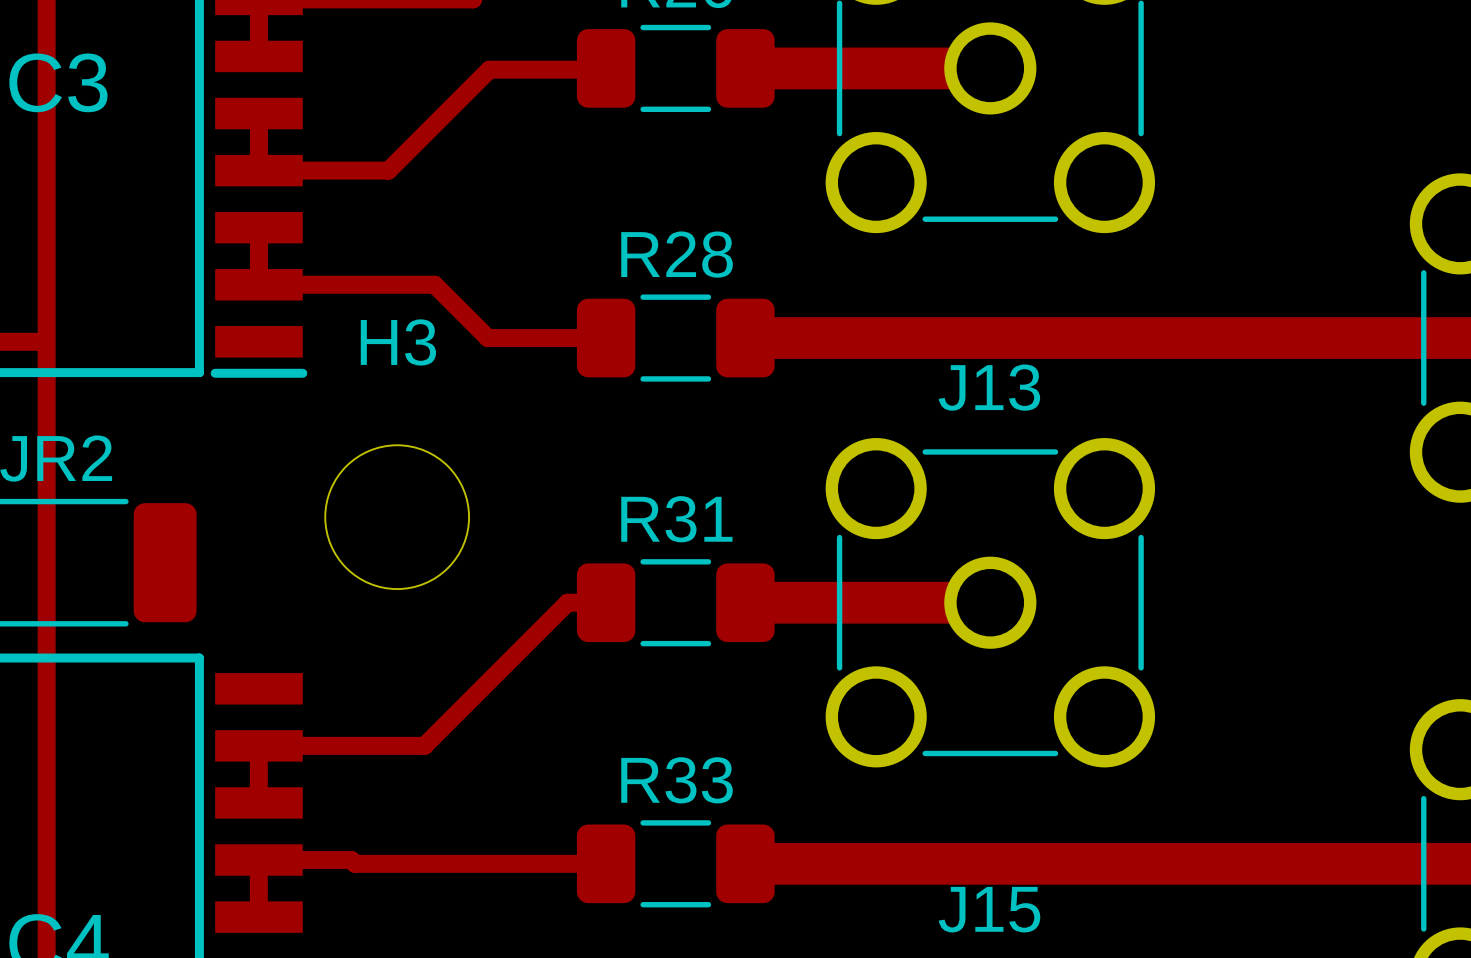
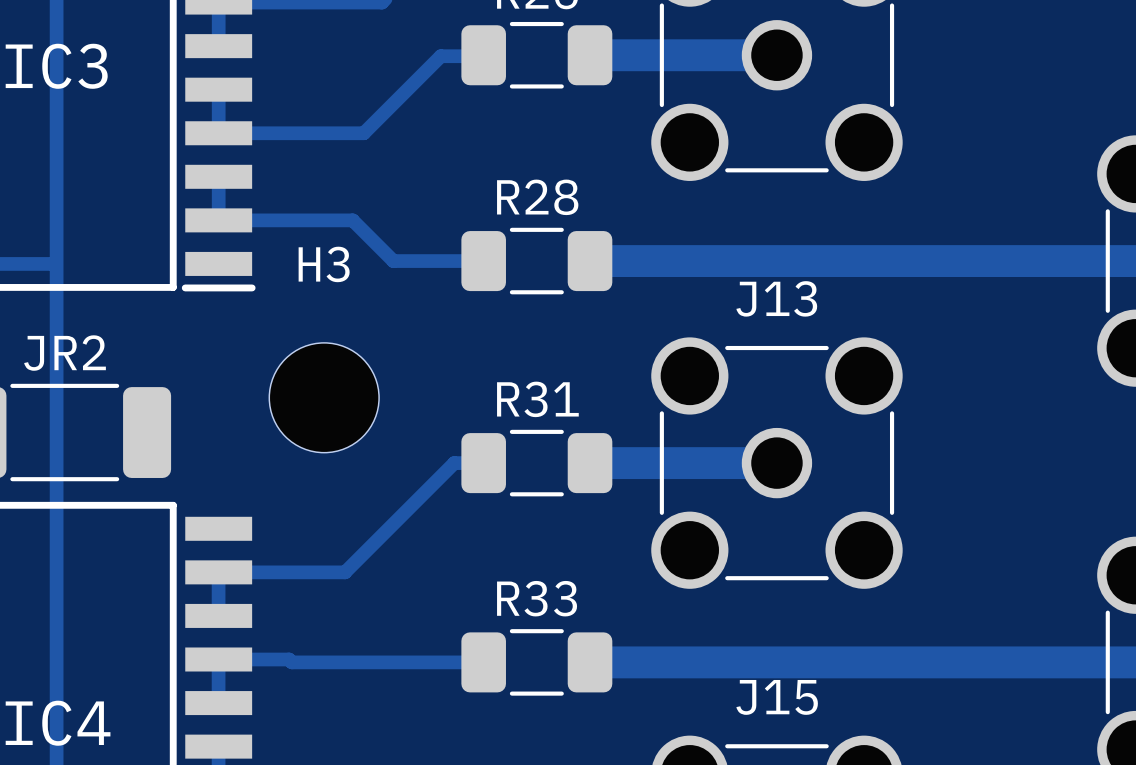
track: (550, 69) (489, 69) (388, 170) -> (440, 56) (363, 133) (317, 133)

